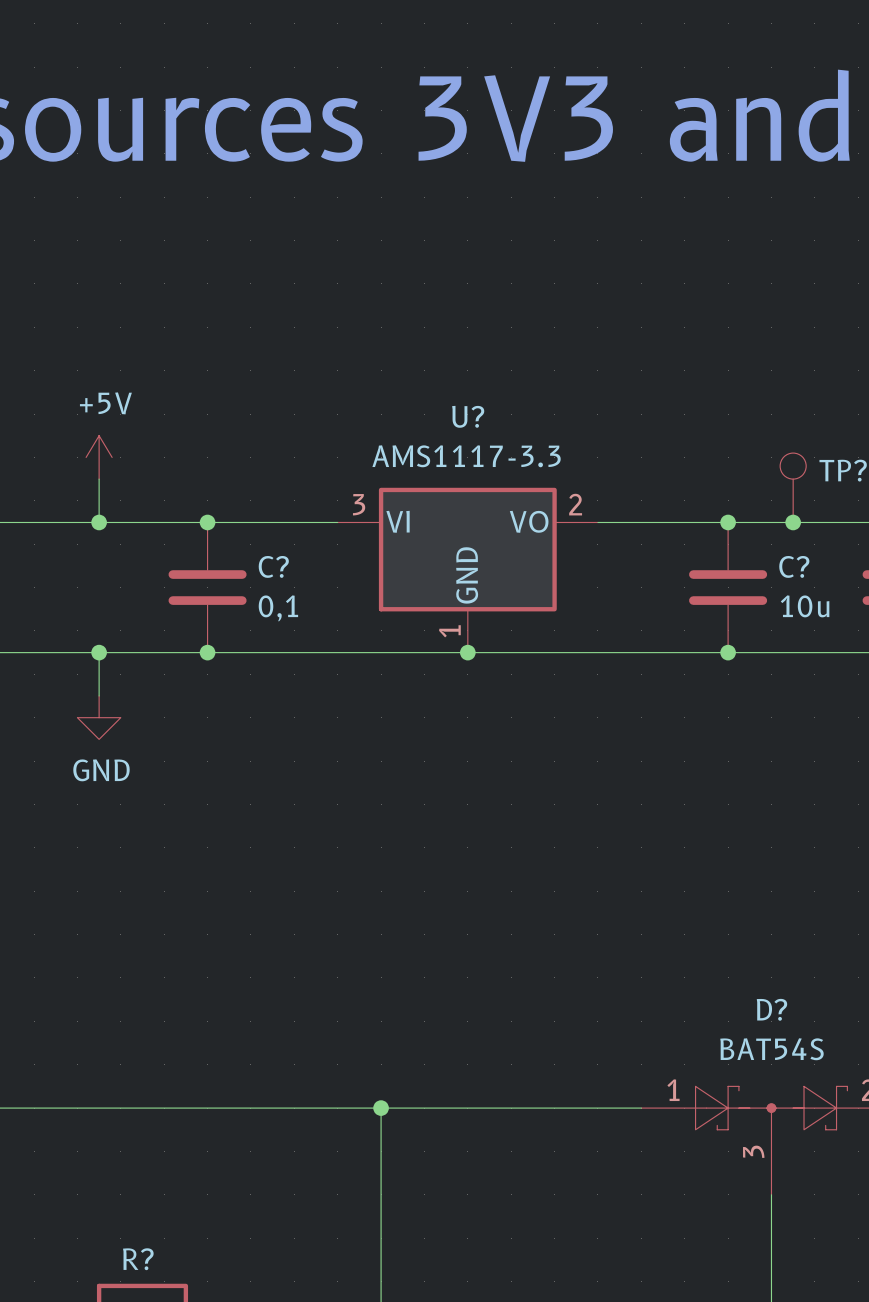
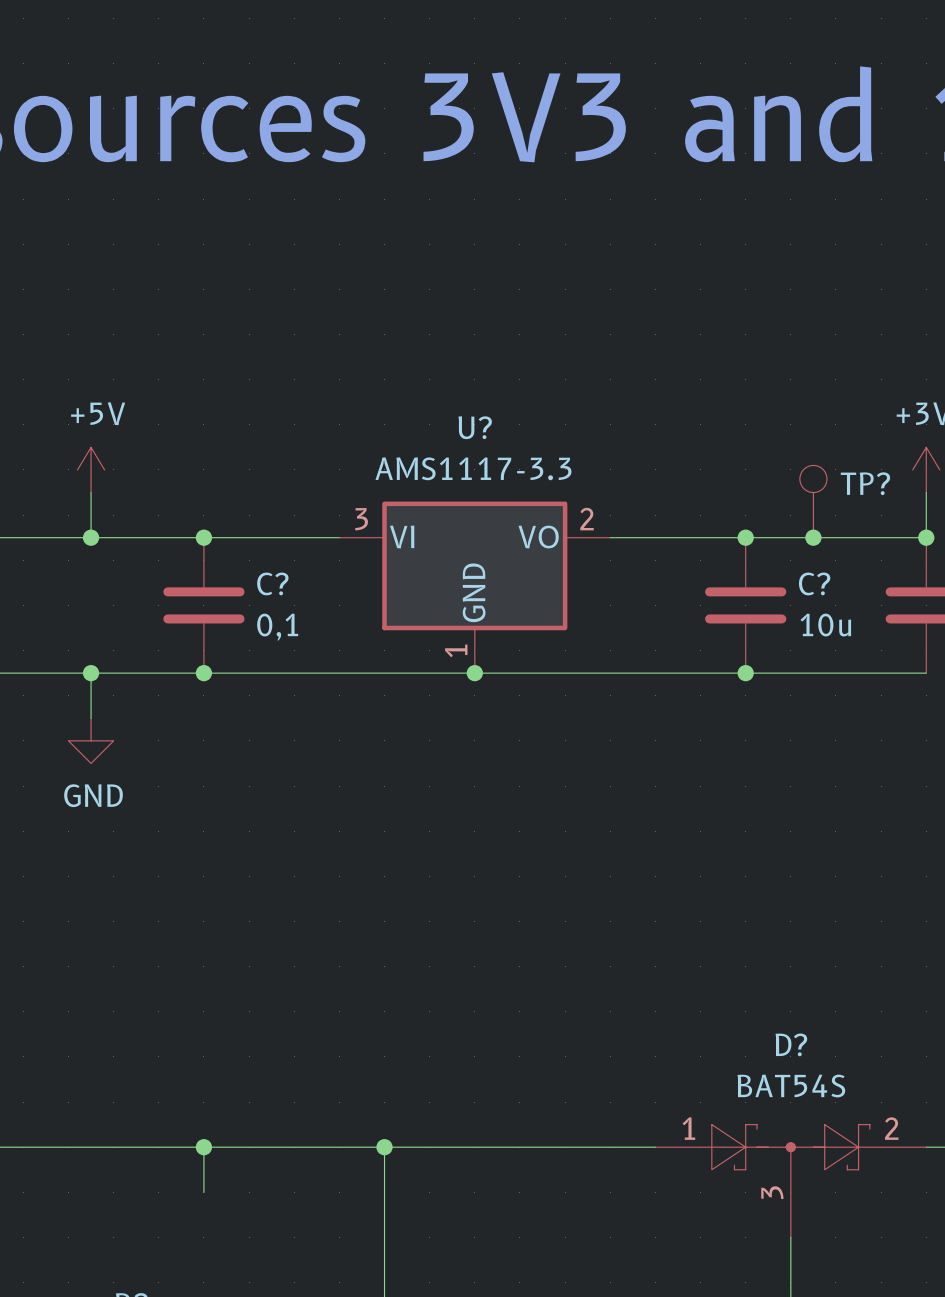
wire: none -> (203, 1147) (203, 1192)
junction: none -> (203, 1147)

